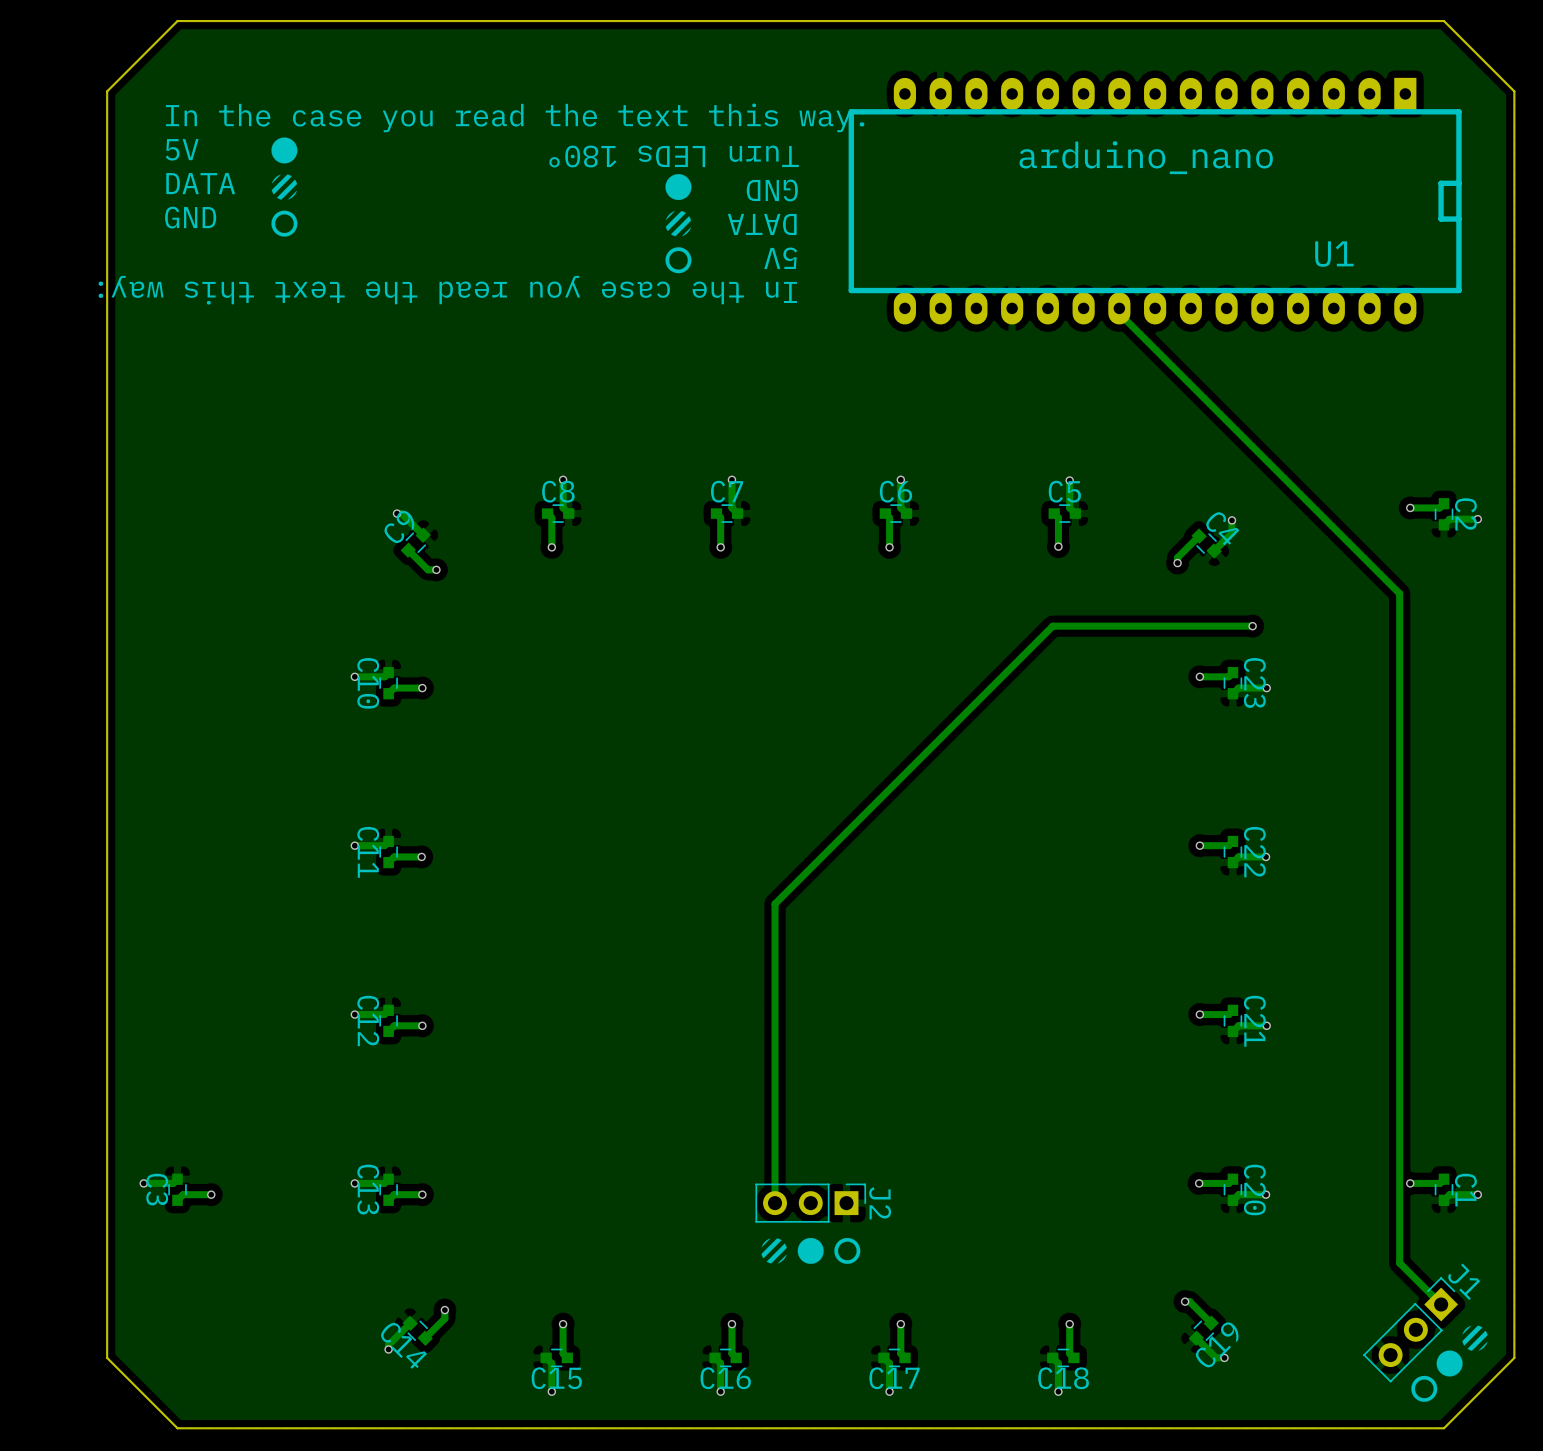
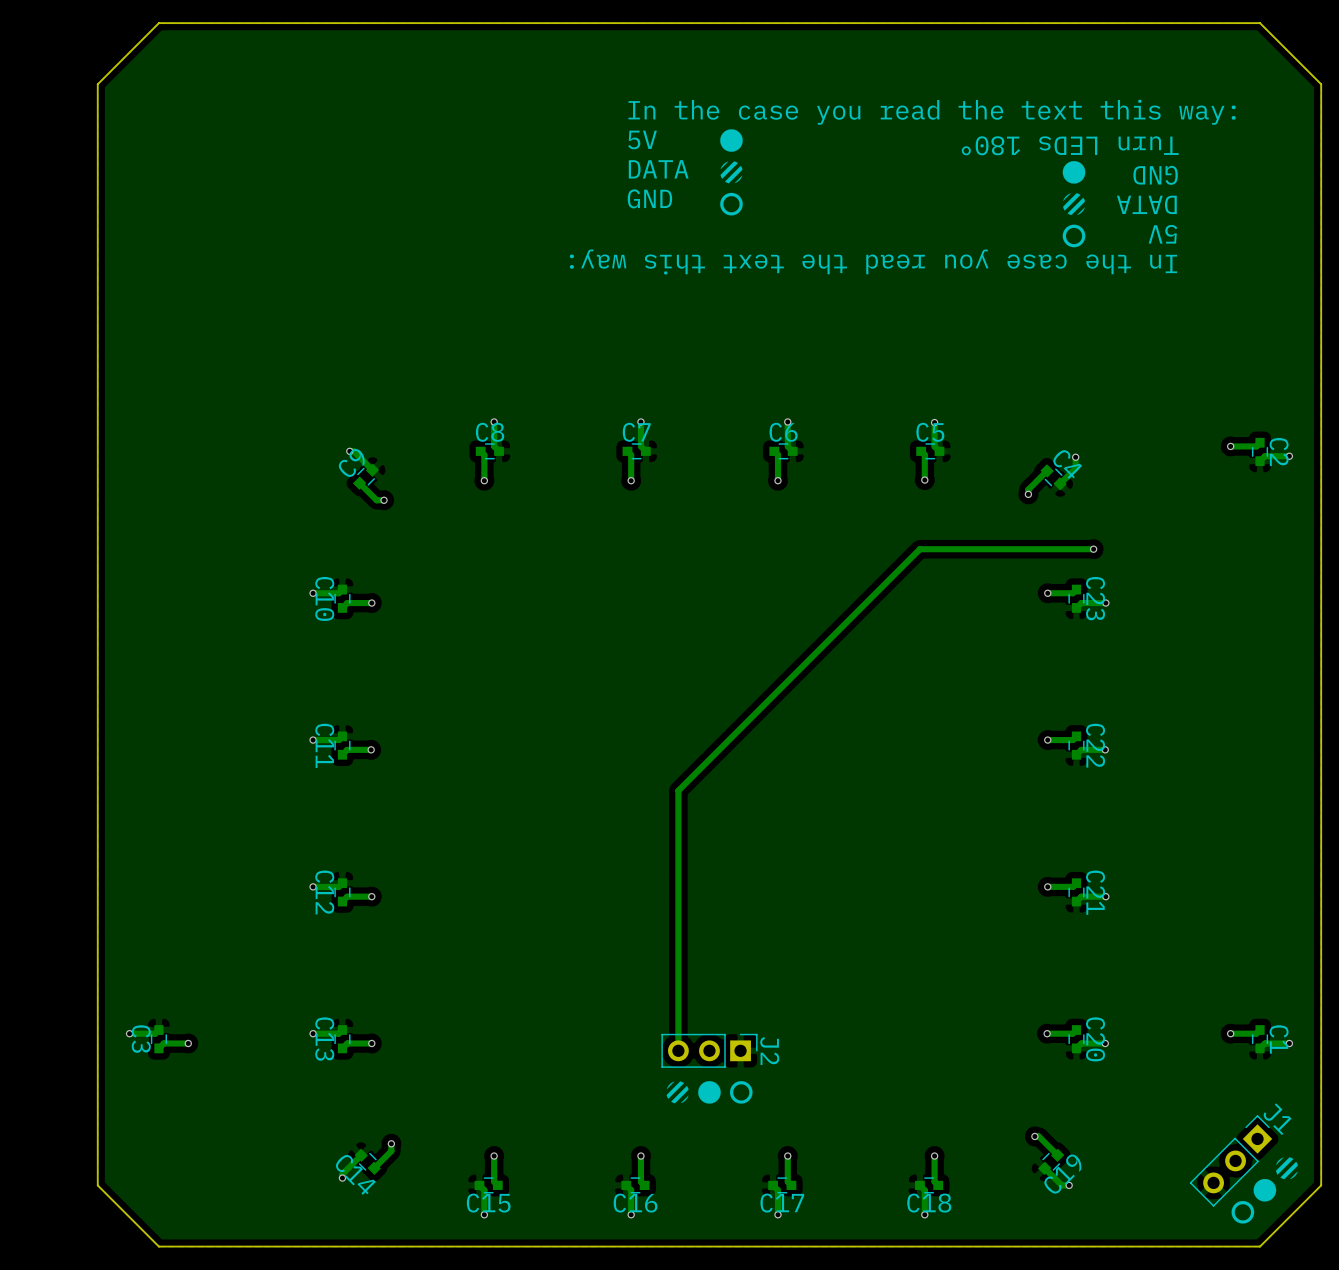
text: In the case you read the text this way: (515, 117) -> none
drawing: [271, 137, 298, 237] -> none
text: 5V (182, 149) -> none
text: Turn LEDs 180° (674, 156) -> none
text: none -> Turn LEDs 180° (1070, 145)
drawing: none -> [1062, 161, 1086, 248]
text: DATA (200, 183) -> none
drawing position: (678, 187) -> (731, 140)
text rotation: 0° (772, 190) -> 180° (649, 198)
text: none -> GND (1155, 175)
U1: arduino_nano (1155, 201) -> none
text: GND (190, 217) -> none
drawing position: (678, 223) -> (731, 172)
text rotation: 0° (762, 224) -> 180° (658, 169)
text: none -> DATA (1146, 204)
text rotation: 0° (780, 258) -> 180° (642, 139)
text position: 5V (780, 258) -> 5V (642, 139)
drawing position: (678, 260) -> (731, 204)
text: none -> 5V (1163, 234)
text rotation: 0° (447, 290) -> 180° (932, 112)
text: none -> In the case you read the text this way: (873, 262)
track: (1119, 308) (1119, 313) (1399, 593) (1399, 1263) (1441, 1304) -> none

